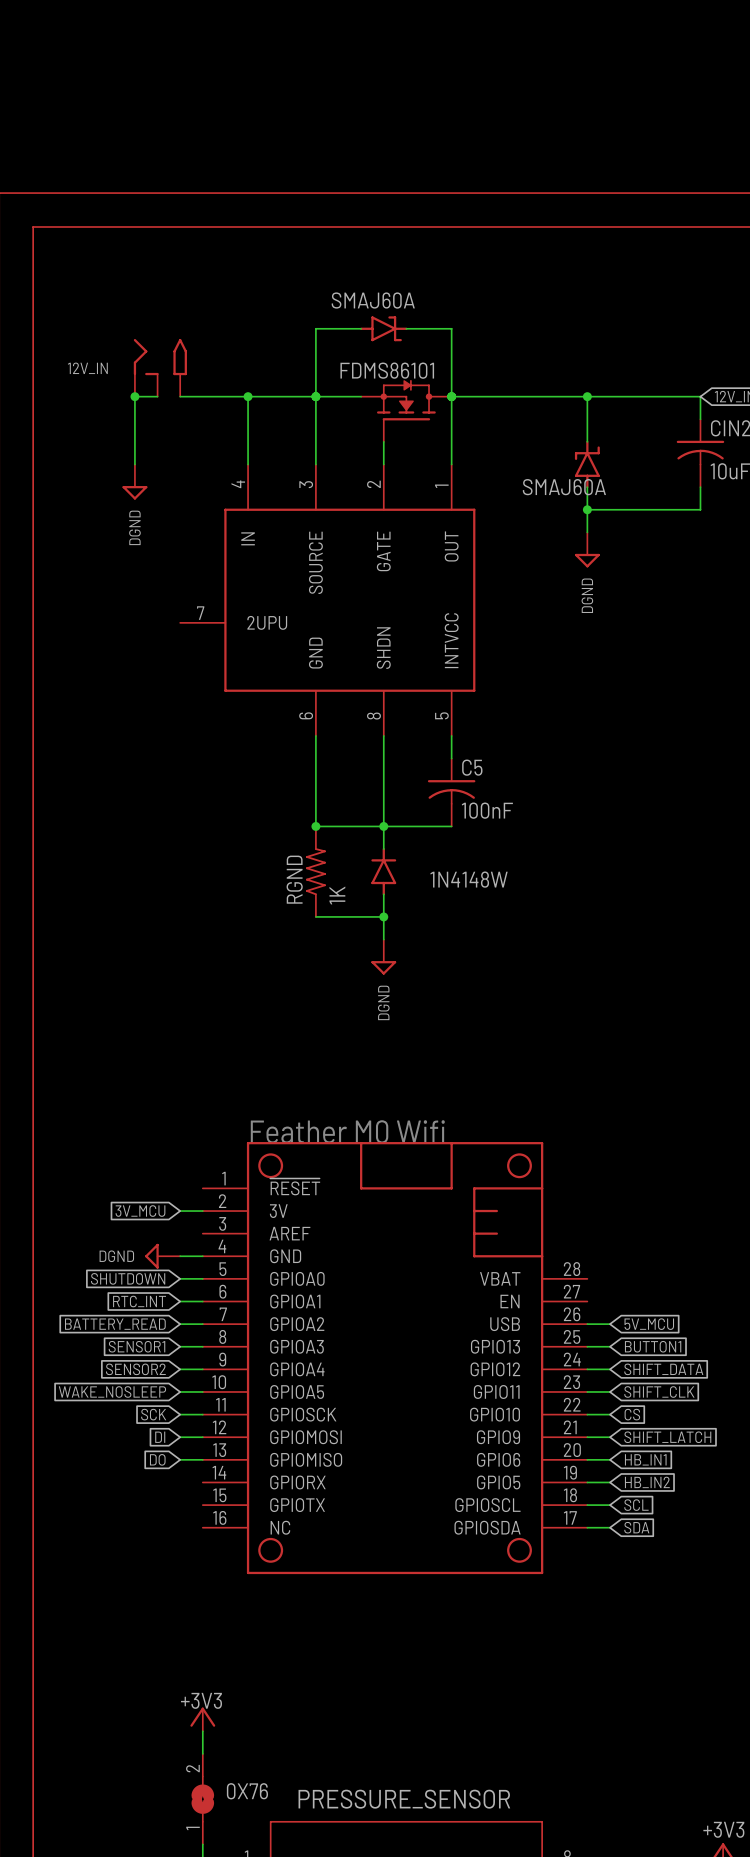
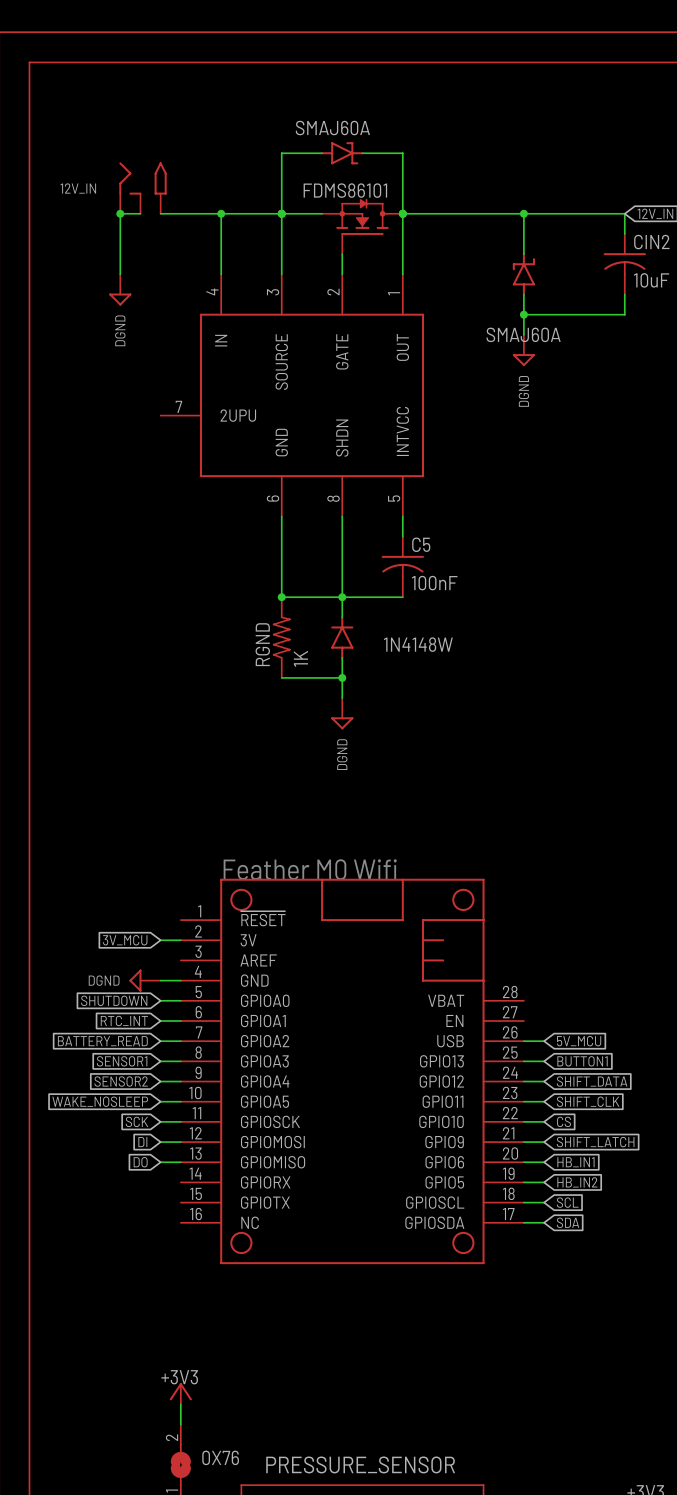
part value position: SMAJ60A (564, 487) -> SMAJ60A (523, 334)

